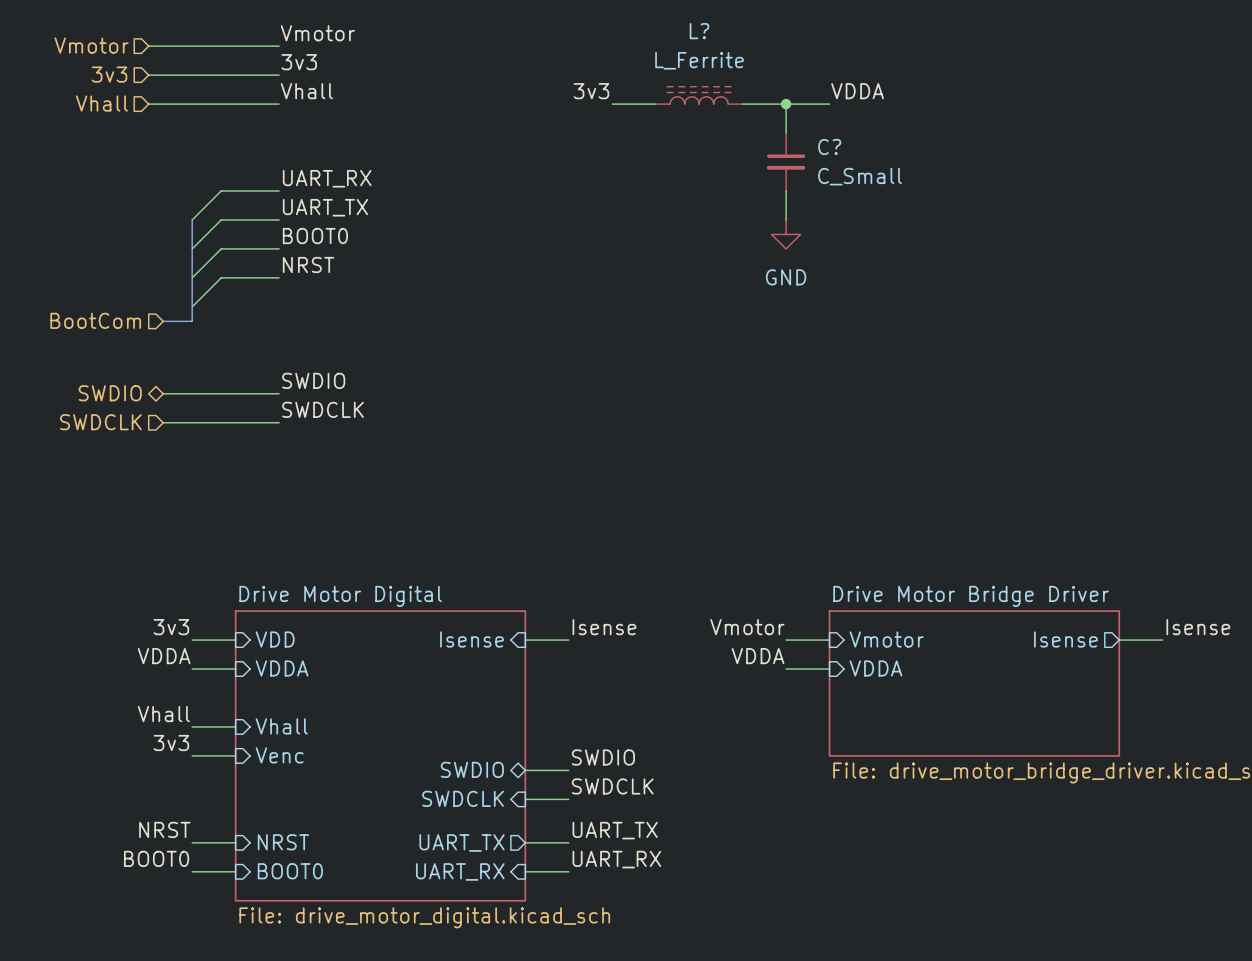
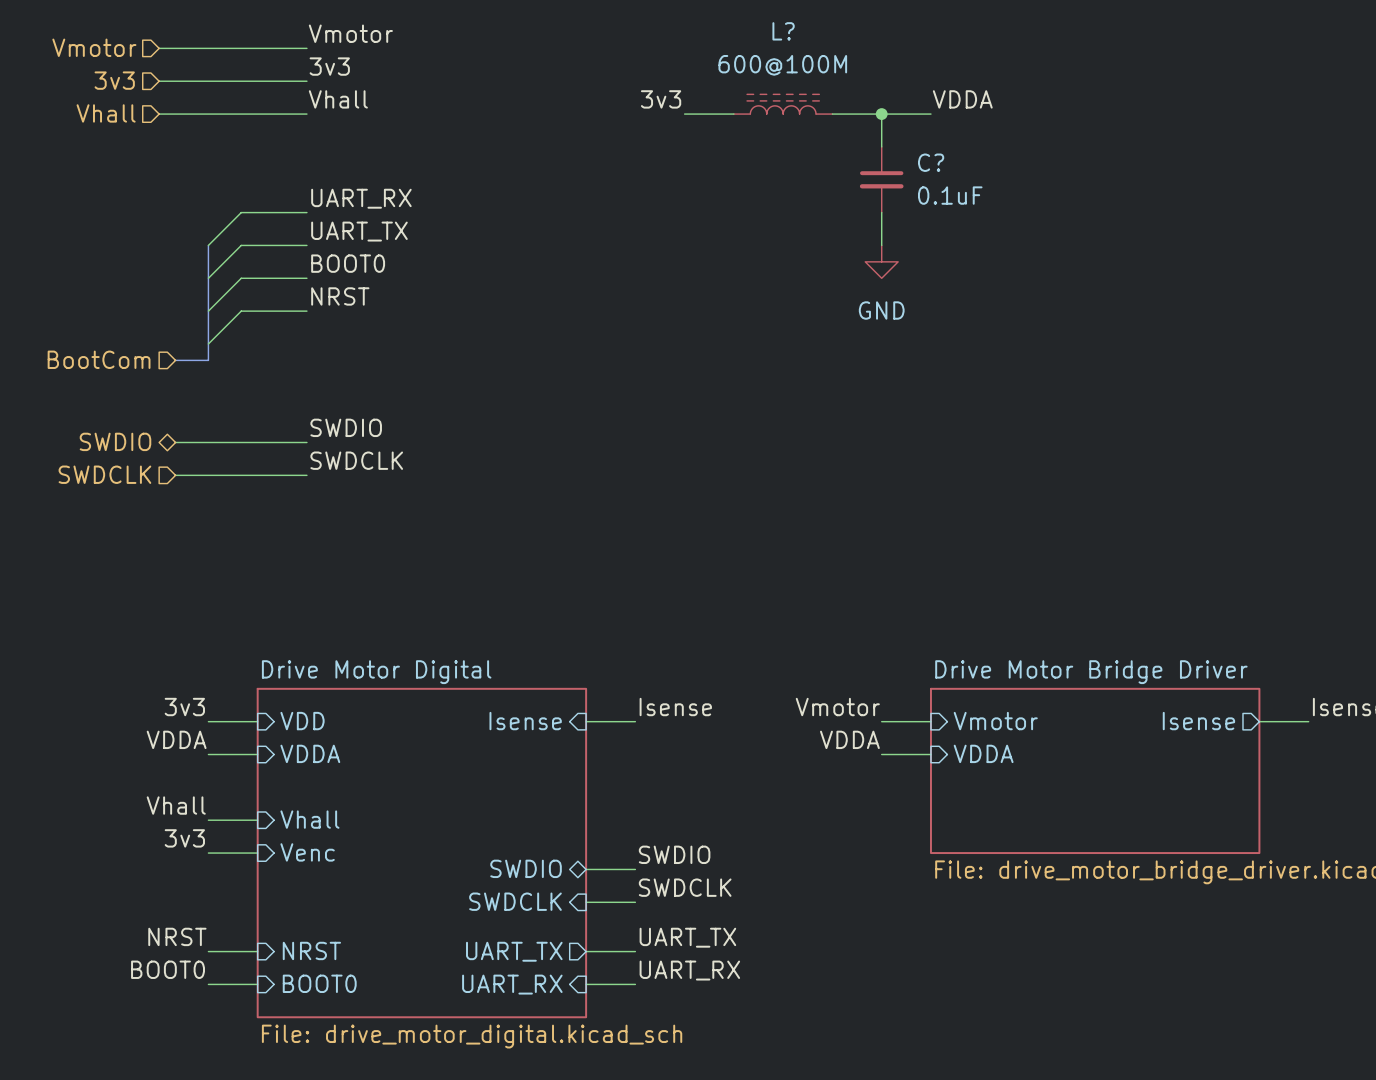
L? value: L_Ferrite (699, 60) -> 600@100M (782, 65)
C? value: C_Small (860, 176) -> 0.1uF (950, 195)

